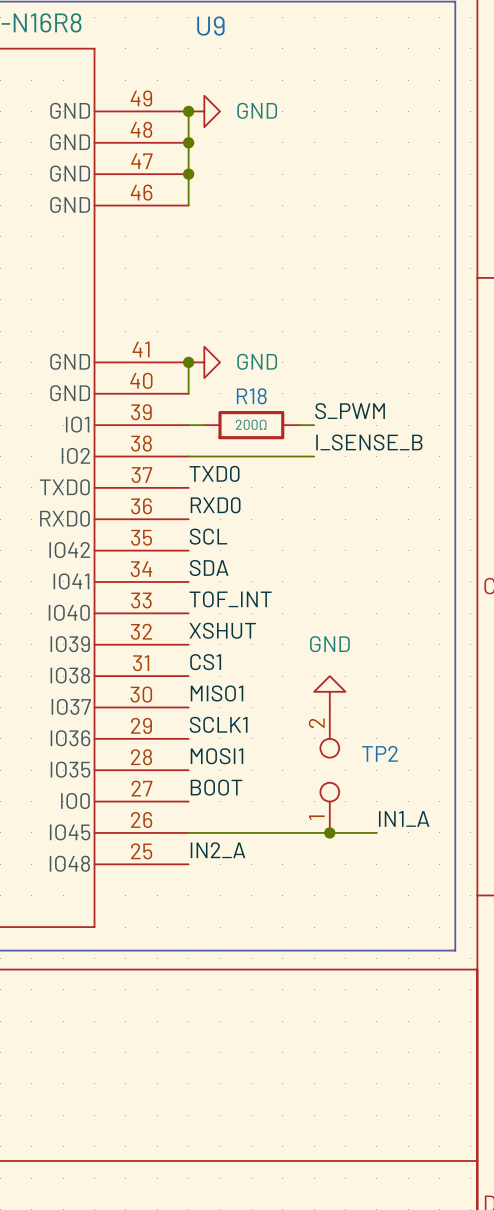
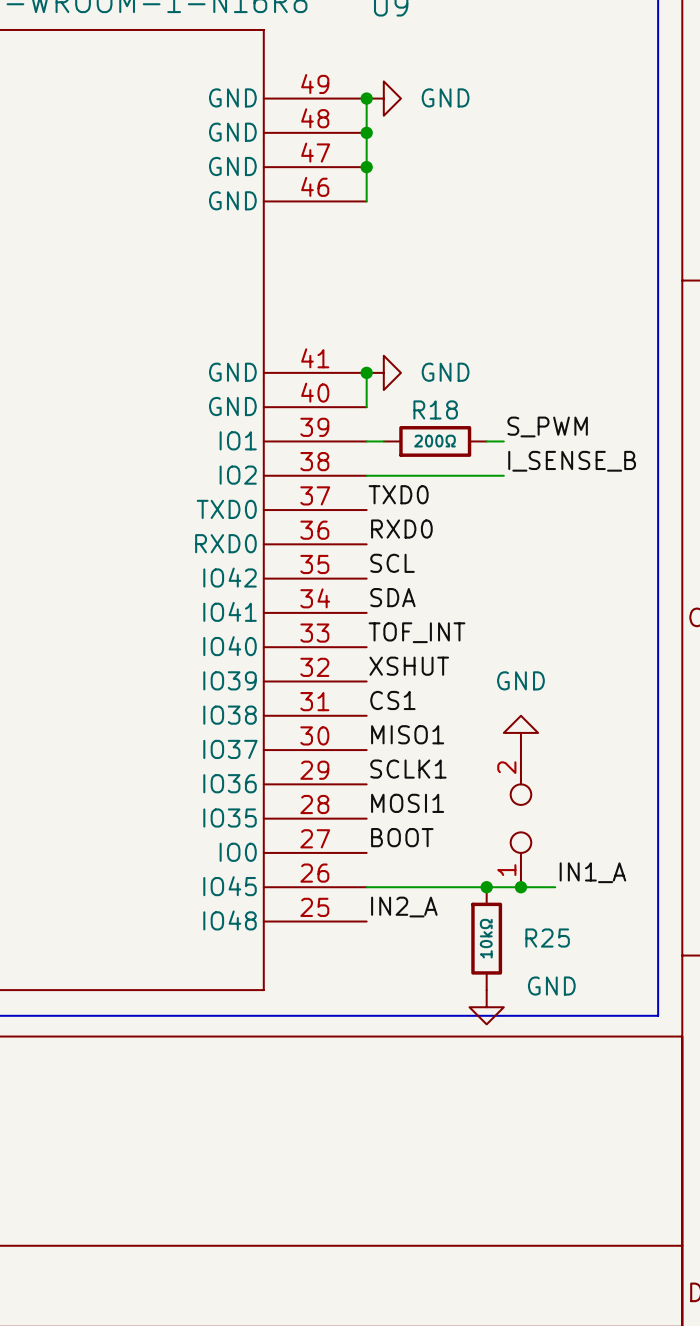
TP2 name: TP2 (380, 753) -> none
label position: IN1_A (404, 818) -> IN1_A (592, 872)
junction: none -> (486, 887)
wire: (361, 832) (376, 832) -> none
R25: none -> 10kΩ (486, 938)
power symbol: none -> GND (486, 1007)

